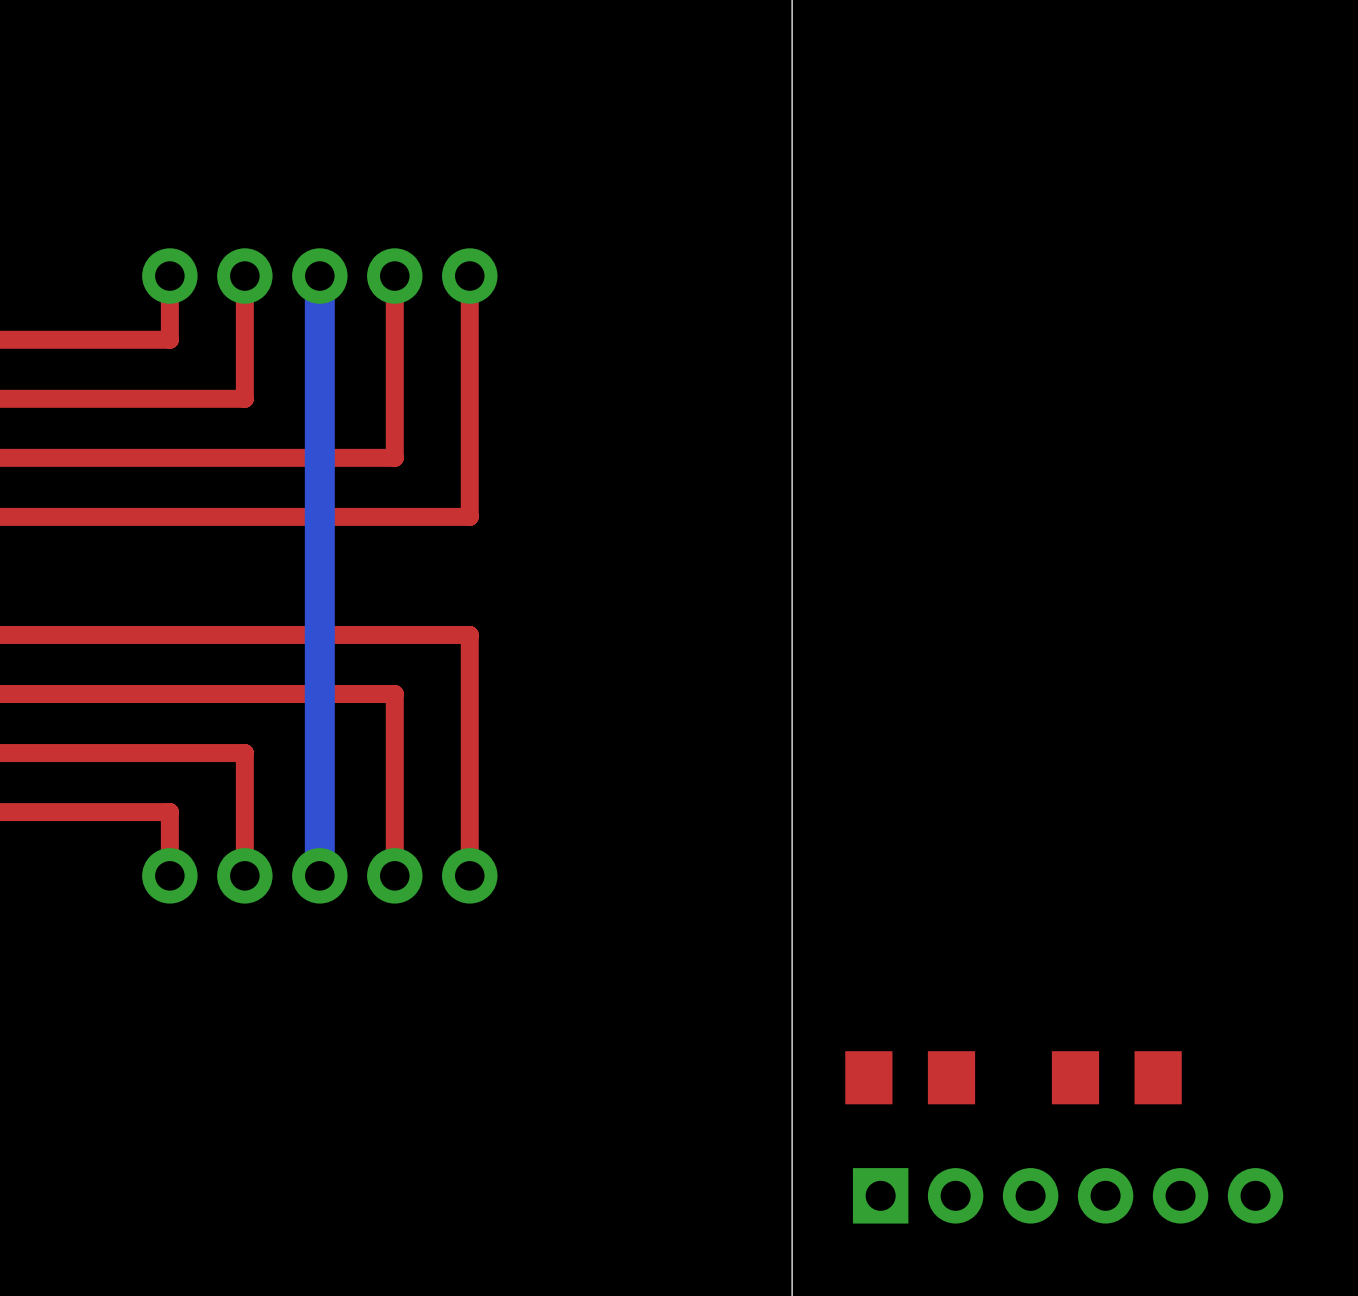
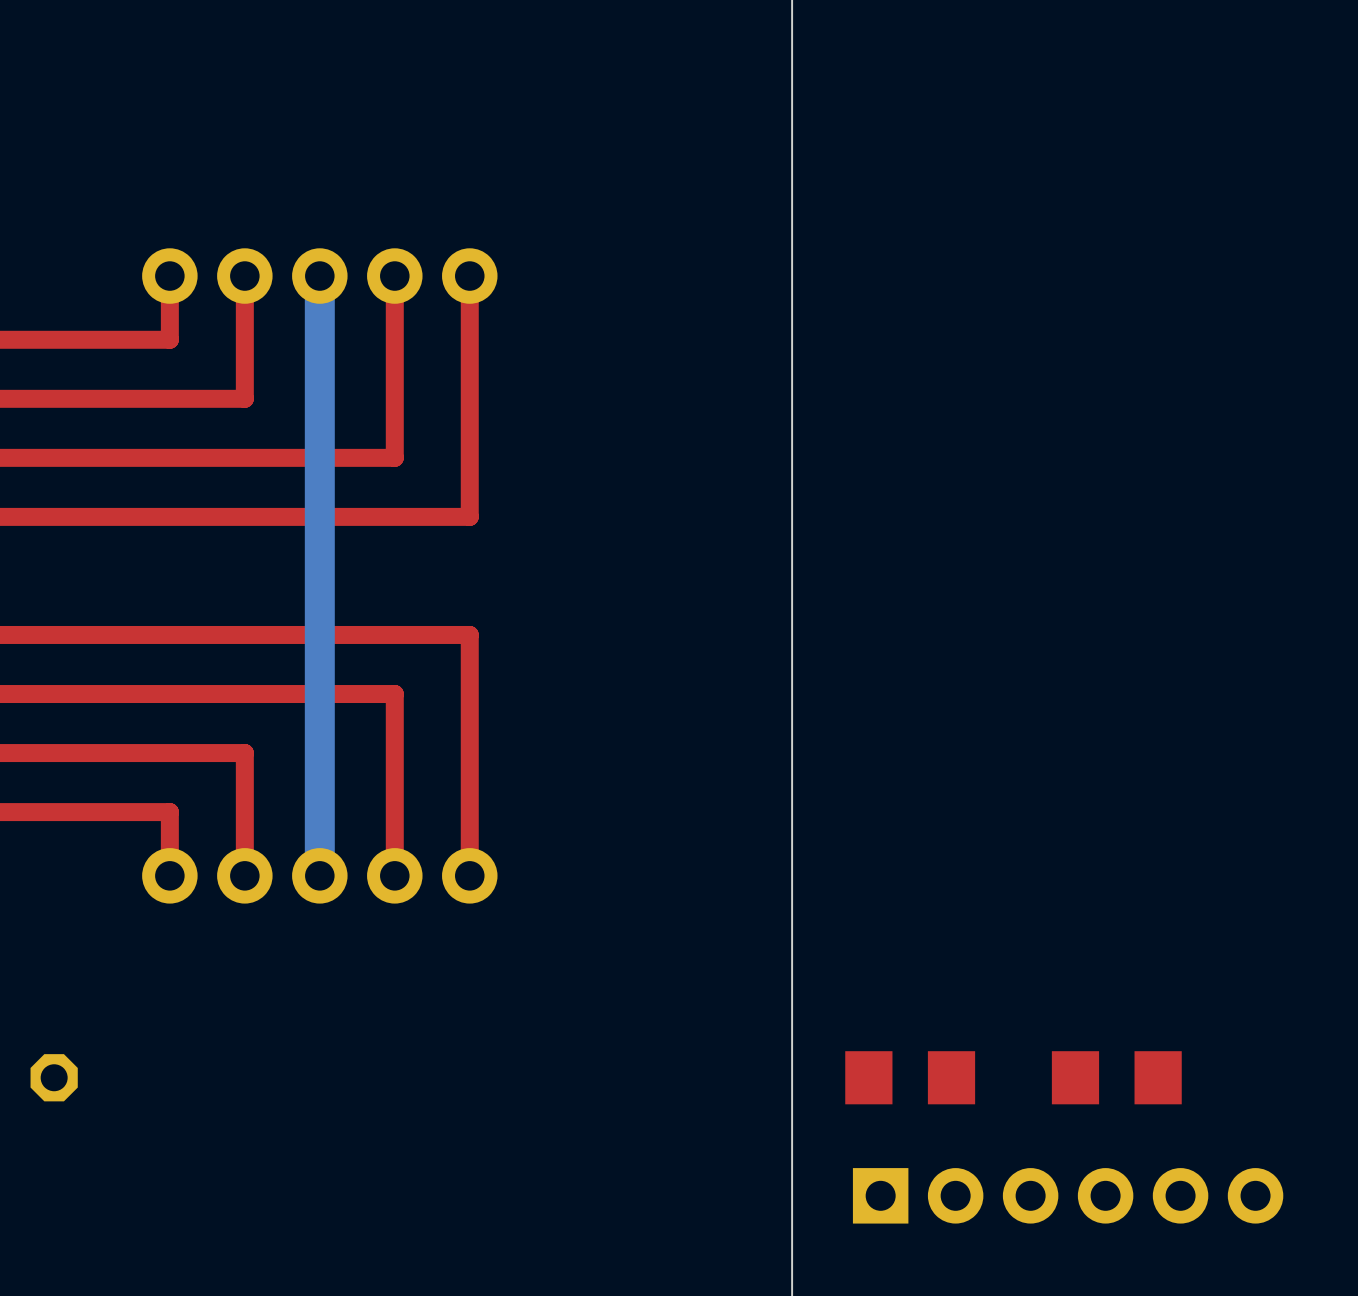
part: none -> (54, 1077)

